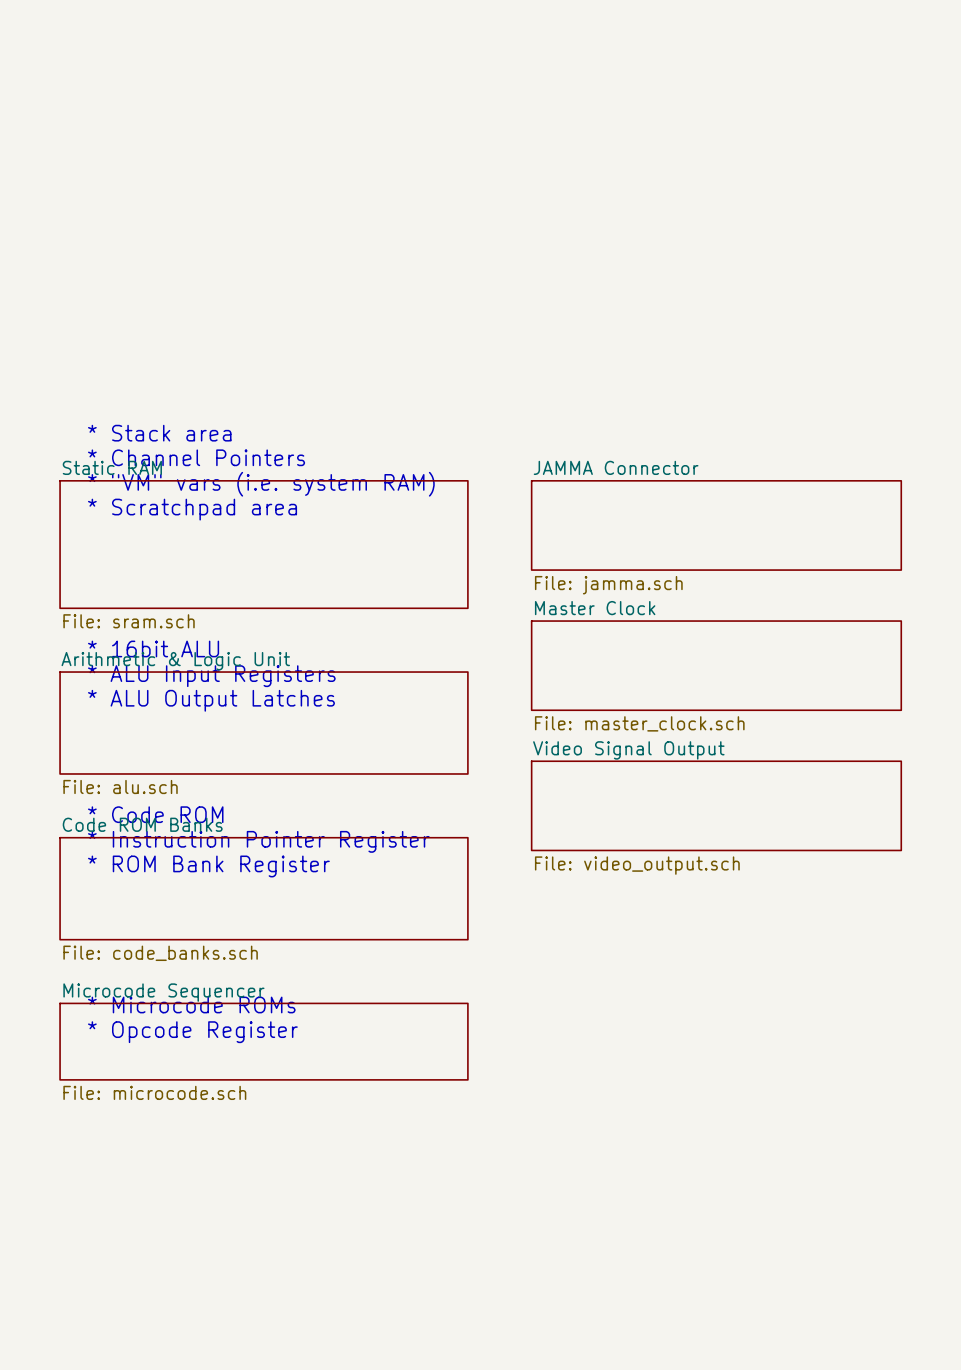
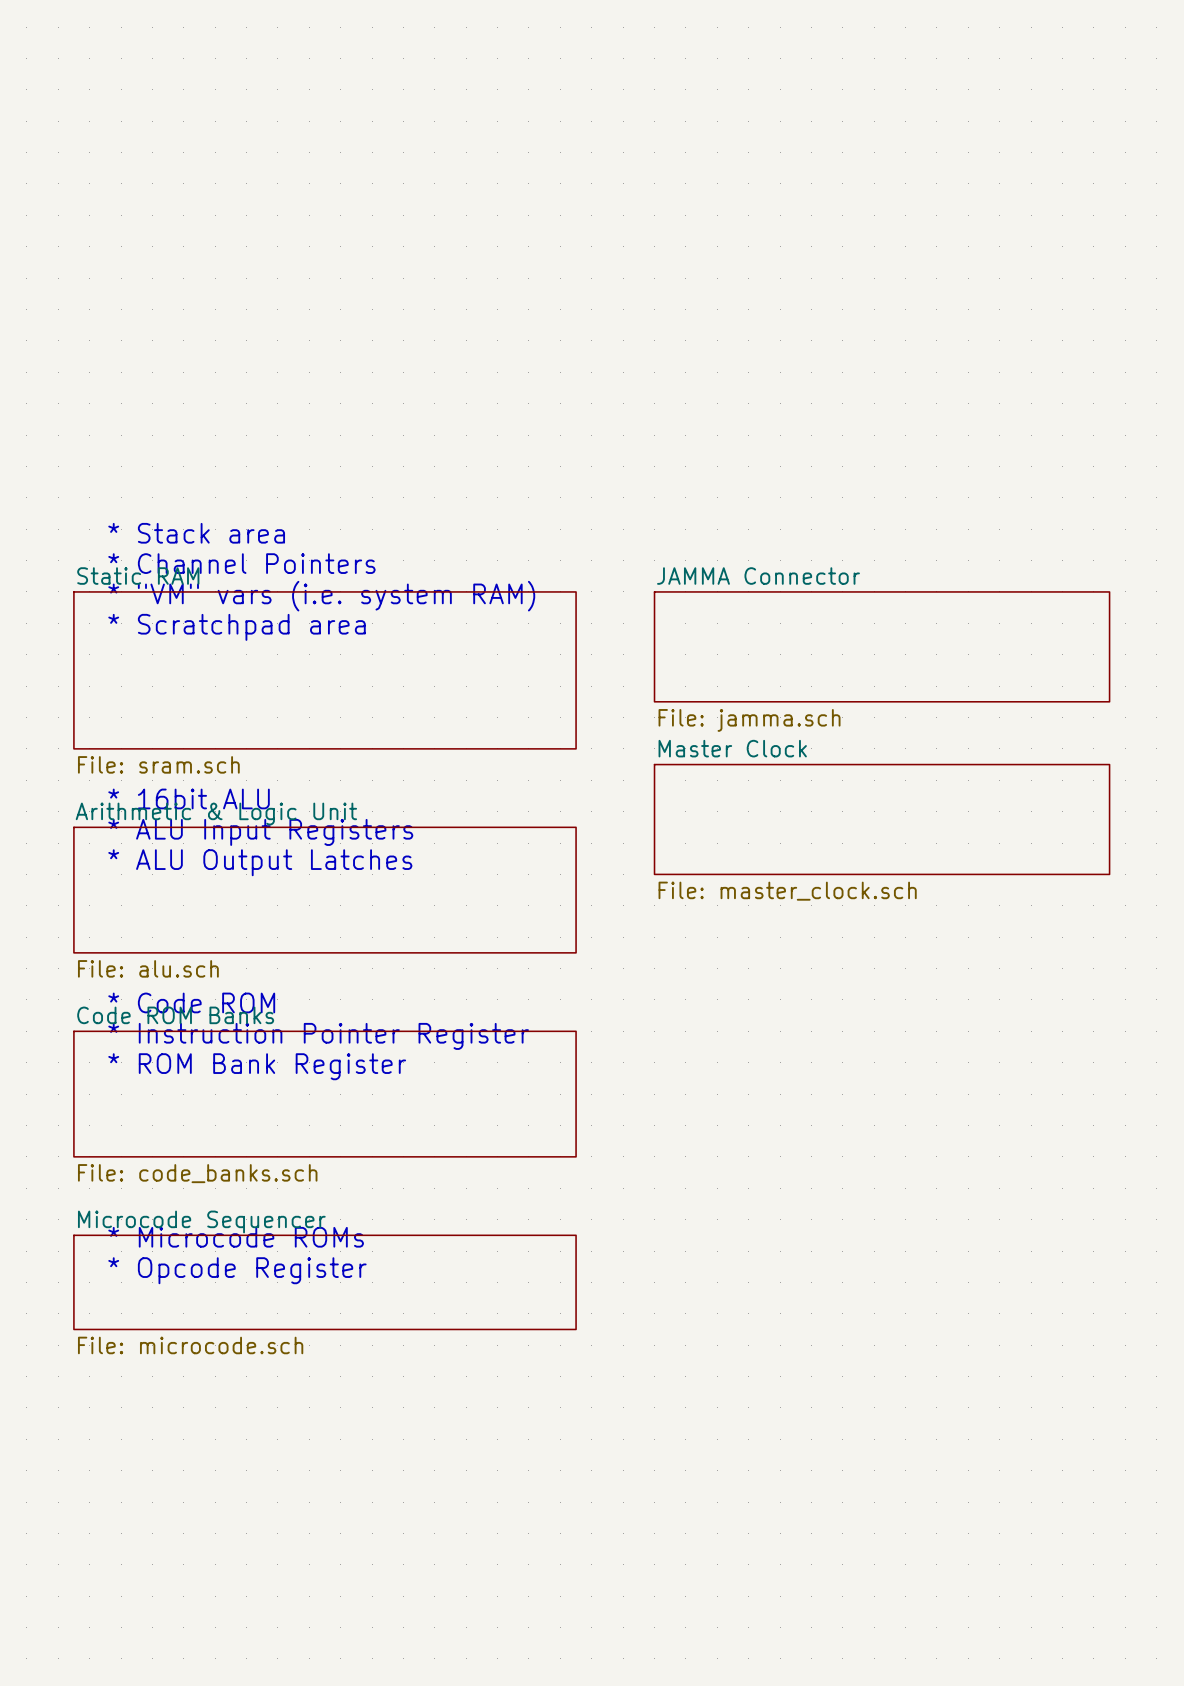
sheet Video Signal Output: File: video_output.sch (716, 805) -> none

